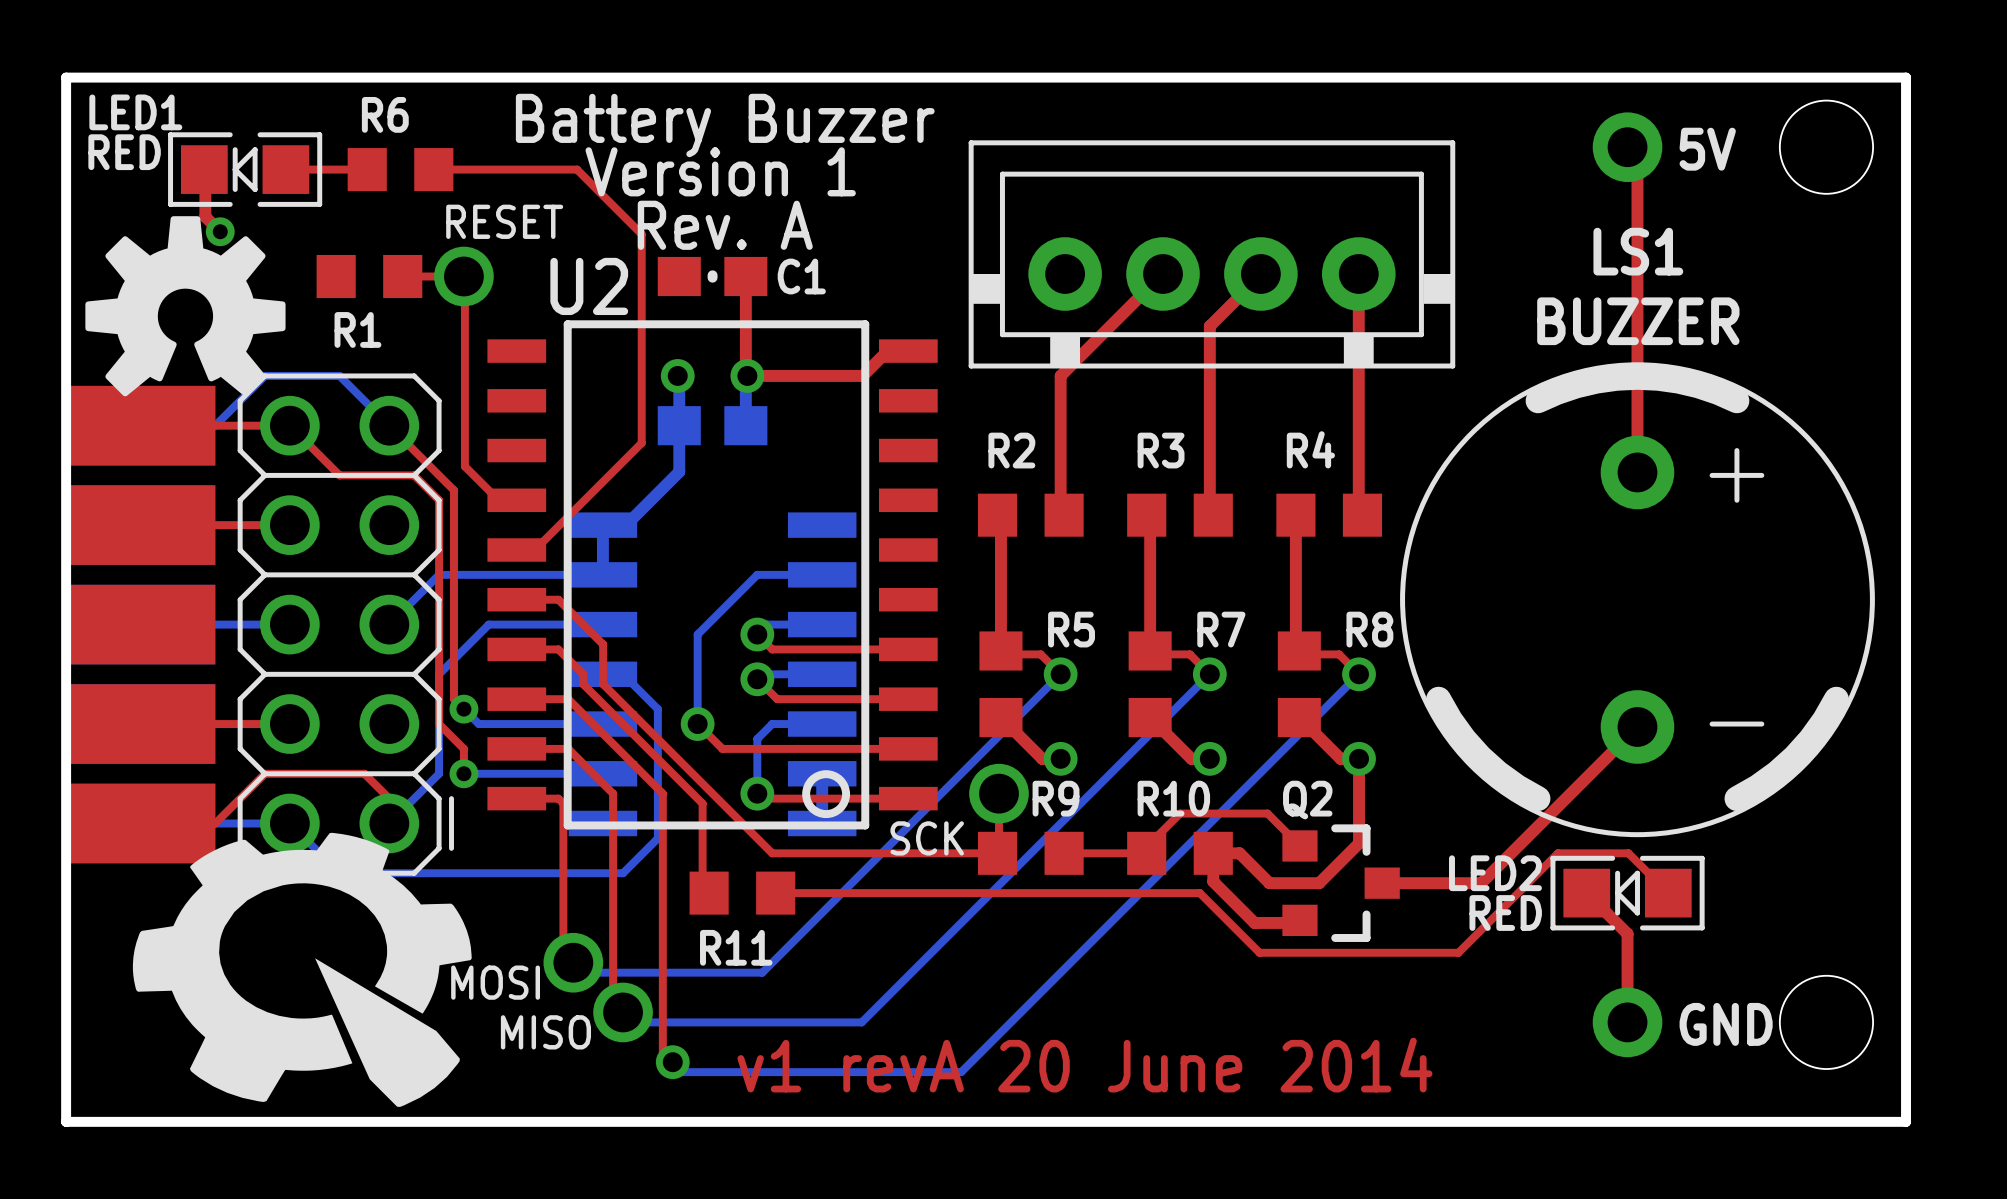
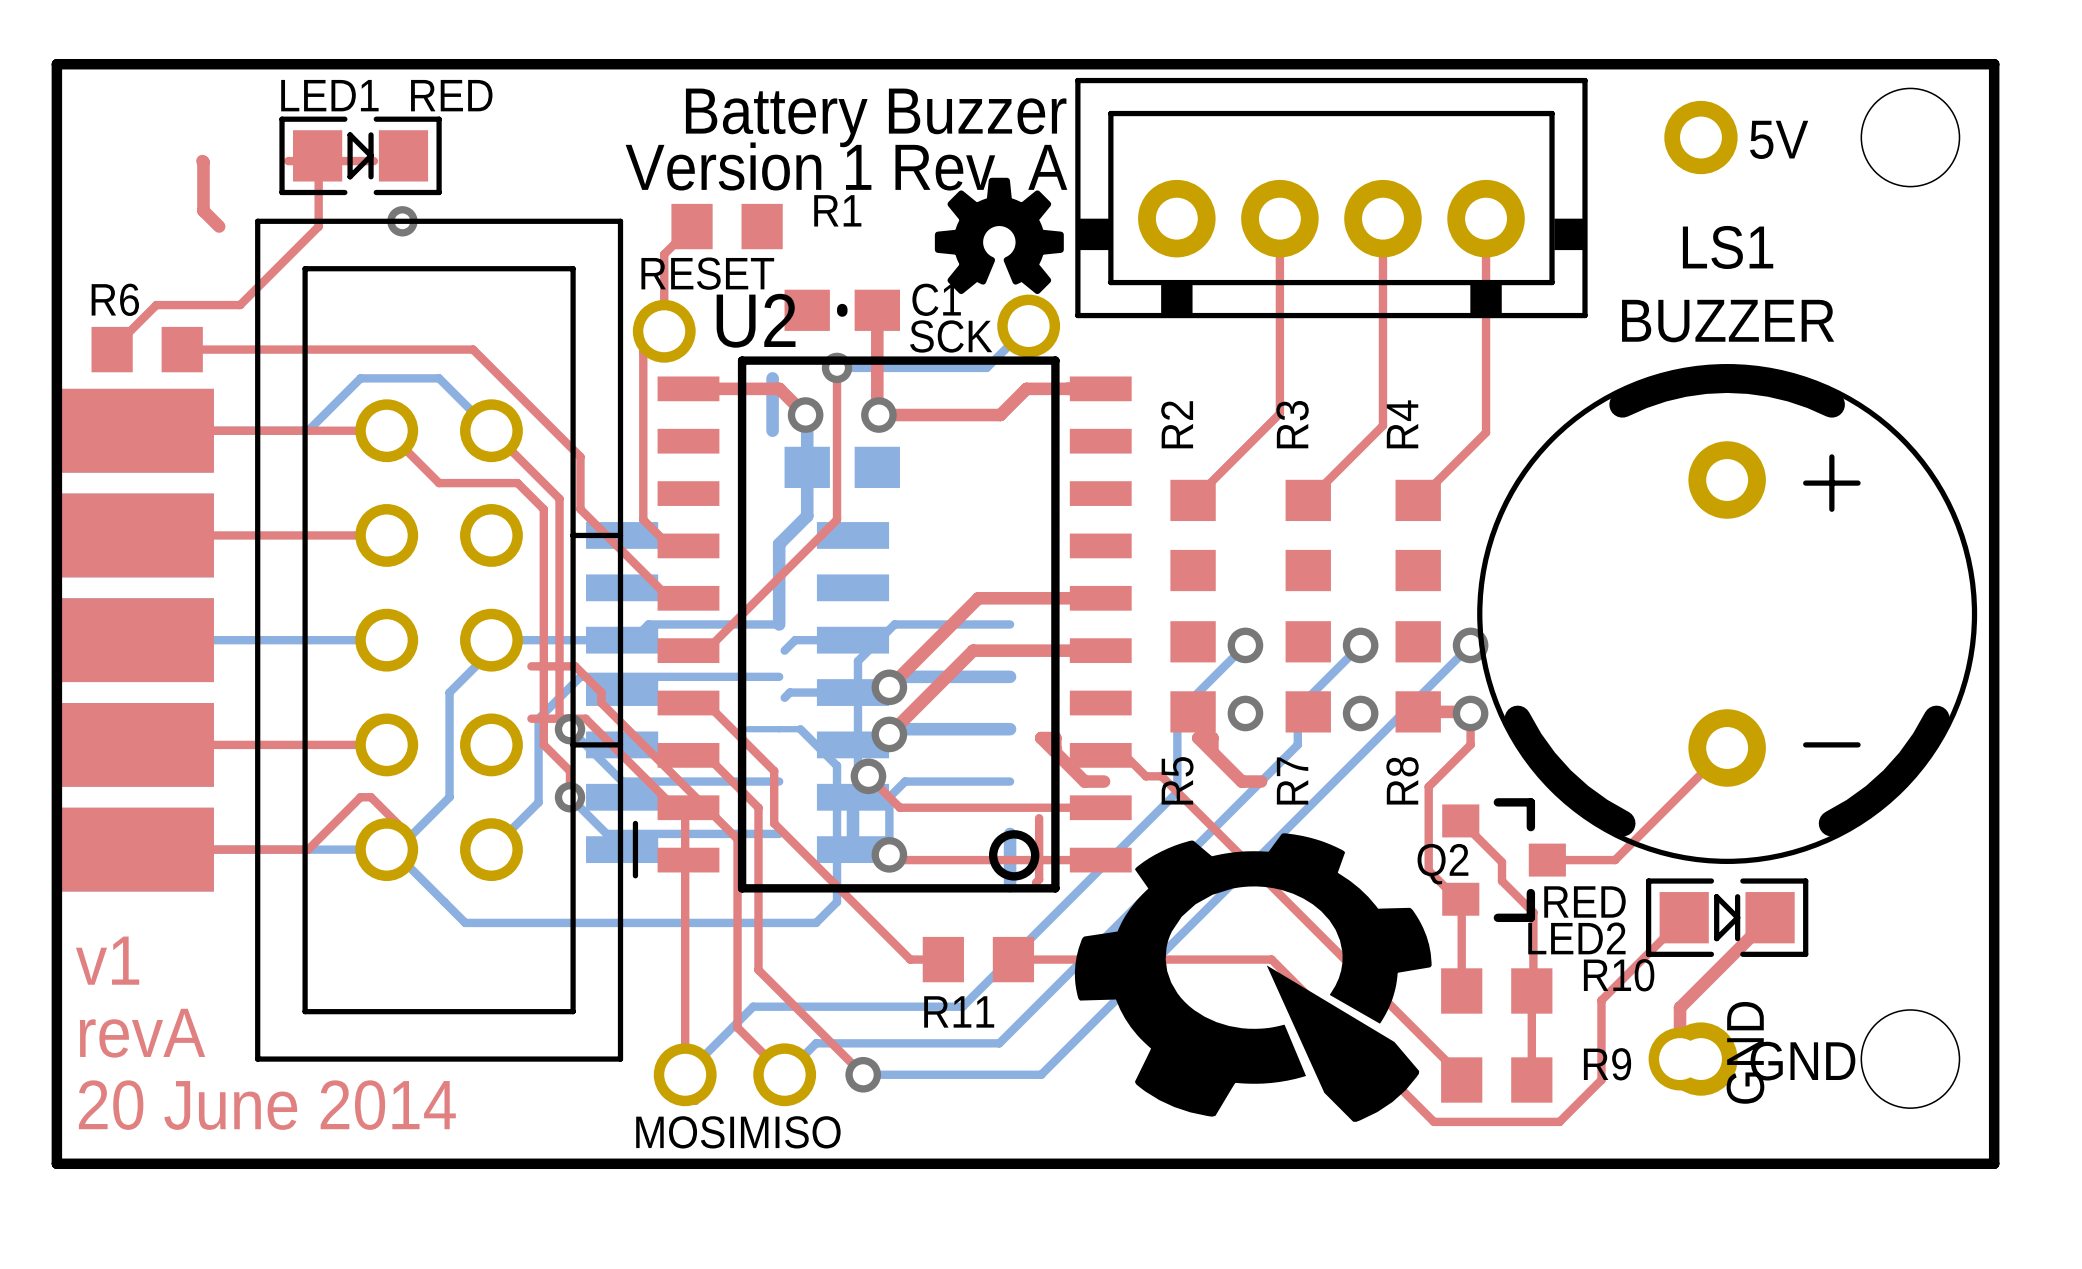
LED1 name position: LED1 (135, 112) -> LED1 (329, 95)
R6 name position: R6 (385, 114) -> R6 (115, 299)
text position: Battery Buzzer (725, 125) -> Battery Buzzer (876, 117)
top track: (1627, 147) (1637, 157) (1637, 472) -> none
top track: none -> (317, 155) (318, 226) (240, 305) (156, 305) (112, 349)
LED1 rotation: 0° (245, 169) -> 180° (360, 155)
LED1 position: (245, 169) -> (360, 155)
R6 position: (400, 169) -> (147, 349)
top track: (433, 169) (577, 169) (641, 234) (641, 443) (534, 549) (516, 549) -> none
text: Version 1 (720, 171) -> Version 1 Rev. A (846, 166)
drawing: none -> [934, 177, 1064, 295]
drawing: [85, 216, 286, 397] -> none
top track: none -> (1279, 218) (1279, 413) (1193, 500)
top track: none -> (1382, 218) (1382, 425) (1308, 500)
top track: none -> (1486, 218) (1486, 432) (1418, 500)
text: Rev. A (725, 225) -> none
via position: (220, 231) -> (402, 221)
top track: none -> (692, 226) (664, 254) (664, 331) (643, 352) (643, 519) (669, 545) (688, 545)
part position: (1211, 254) -> (1331, 198)
top track: (1162, 273) (1060, 375) (1060, 511) (1064, 515) -> none
top track: (1260, 273) (1209, 326) (1209, 511) (1213, 515) -> none
top track: (1358, 273) (1358, 511) (1362, 515) -> none
R1 position: (369, 276) -> (727, 226)
top track: (402, 276) (464, 277) (464, 466) (498, 500) (516, 500) -> none
RESET position: (463, 276) -> (664, 331)
C1 position: (712, 276) -> (842, 310)
top track: (745, 276) (745, 374) (747, 375) (862, 375) (887, 351) (926, 351) -> none
C1 name position: C1 (801, 276) -> C1 (936, 299)
top track: none -> (877, 310) (877, 413) (878, 415) (1000, 415) (1026, 388) (1100, 388)
bottom track: none -> (1028, 326) (986, 367) (837, 367)
R1 name position: R1 (357, 329) -> R1 (837, 210)
top track: none -> (182, 349) (473, 349) (580, 456) (580, 509) (669, 598) (688, 598)
top track: none -> (837, 367) (837, 519) (706, 650) (688, 650)
via: none -> (837, 367)
bottom track: (677, 375) (679, 375) (679, 471) (623, 528) (605, 528) (602, 525) (602, 574) -> none
via: (677, 375) -> none
via position: (747, 375) -> (805, 415)
top track: none -> (688, 388) (779, 388) (805, 415)
bottom track: none -> (805, 415) (807, 415) (807, 516) (779, 544) (779, 624) (648, 624) (632, 640) (622, 640)
via: none -> (878, 415)
bottom track: (215, 425) (265, 375) (339, 375) (389, 425) -> (213, 430) (308, 430) (360, 378) (439, 378) (491, 430)
top track: (289, 425) (339, 475) (414, 475) (439, 500) (439, 724) (463, 748) (463, 773) -> (292, 430) (386, 430) (439, 483) (517, 483) (543, 509) (543, 744) (569, 771) (569, 797)
top track: (389, 425) (453, 490) (453, 699) (463, 709) -> (491, 430) (559, 498) (559, 718) (569, 729)
part position: (712, 425) -> (842, 467)
top track: (997, 515) (1000, 518) (1000, 650) (1004, 654) (1040, 654) (1060, 674) -> none
R2 rotation: 0° (1030, 515) -> 90° clockwise (1193, 535)
R2 position: (1030, 515) -> (1193, 535)
top track: (1146, 515) (1150, 518) (1150, 650) (1153, 654) (1189, 654) (1209, 674) -> none
R3 rotation: 0° (1180, 515) -> 90° clockwise (1308, 535)
R3 position: (1180, 515) -> (1308, 535)
top track: (1295, 515) (1295, 647) (1302, 654) (1339, 654) (1359, 674) -> none
R4 rotation: 0° (1329, 515) -> 90° clockwise (1418, 535)
top track: none -> (292, 535) (386, 535)
bottom track: (602, 574) (439, 574) (389, 624) -> none
U2 position: (712, 574) -> (894, 624)
bottom track: (822, 574) (757, 574) (697, 634) (697, 724) -> none
top track: none -> (1100, 598) (978, 598) (889, 687)
top track: (516, 599) (558, 599) (603, 644) (603, 684) (772, 853) (997, 853) -> none
LS1 position: (1637, 599) -> (1727, 614)
bottom track: none -> (1010, 624) (894, 624) (857, 661) (857, 765) (868, 776)
bottom track: none -> (292, 640) (386, 640)
part: (345, 624) -> none
part: none -> (446, 640)
R5 name rotation: 0° (1071, 629) -> 90° counterclockwise (1177, 780)
R5 name position: R5 (1071, 629) -> R5 (1177, 780)
via: none -> (1245, 645)
R7 name rotation: 0° (1221, 629) -> 90° counterclockwise (1292, 780)
R7 name position: R7 (1221, 629) -> R7 (1292, 780)
bottom track: none -> (1360, 645) (1297, 708) (1297, 744) (999, 1043) (816, 1043) (784, 1074)
via: none -> (1360, 645)
R8 name rotation: 0° (1369, 629) -> 90° counterclockwise (1402, 780)
R8 name position: R8 (1369, 629) -> R8 (1402, 780)
bottom track: none -> (1470, 645) (1041, 1074) (863, 1074)
via: none -> (1470, 645)
top track: (757, 634) (772, 649) (908, 649) -> none
via: (757, 634) -> none
top track: none -> (1100, 650) (973, 650) (889, 734)
bottom track: none -> (779, 676) (580, 676) (538, 718) (538, 802) (491, 849)
bottom track: none -> (1010, 676) (899, 676) (889, 687)
via: none -> (889, 687)
bottom track: (623, 674) (657, 709) (657, 838) (623, 873) (339, 873) (289, 823) -> (748, 729) (800, 729) (837, 765) (837, 901) (816, 922) (465, 922) (391, 849) (292, 849)
bottom track: (1060, 674) (762, 972) -> (1245, 645) (1177, 713) (1177, 792) (962, 1006) (789, 1006)
via: (1060, 674) -> none
bottom track: (1209, 674) (861, 1022) (633, 1022) (623, 1012) -> none
via position: (1209, 674) -> (1245, 713)
bottom track: (1359, 674) (961, 1072) (682, 1072) (672, 1062) -> none
via: (1359, 674) -> none
top track: (757, 679) (777, 699) (908, 699) -> none
via: (757, 679) -> none
top track: none -> (679, 703) (706, 703) (774, 771) (774, 823) (910, 959) (943, 959)
R5 position: (1000, 684) -> (1193, 676)
R7 position: (1150, 684) -> (1308, 676)
R8 position: (1299, 684) -> (1418, 676)
top track: none -> (1418, 711) (1468, 711) (1470, 713) (1470, 744) (1428, 786) (1428, 870) (1457, 899) (1460, 899) (1466, 905)
via: none -> (1360, 713)
via: none -> (1470, 713)
bottom track: (463, 709) (478, 724) (602, 724) -> none
via: (463, 709) -> none
bottom track: none -> (569, 729) (622, 781) (779, 781)
via: none -> (569, 729)
bottom track: none -> (1010, 729) (894, 729) (889, 734)
via: none -> (889, 734)
top track: none -> (292, 744) (386, 744)
top track: (697, 724) (722, 748) (908, 748) -> none
via: (697, 724) -> none
bottom track: (822, 724) (772, 724) (757, 738) (757, 793) -> none
top track: (1637, 726) (1481, 883) (1382, 883) -> none
top track: none -> (1727, 747) (1615, 860) (1547, 860)
top track: (1312, 727) (1312, 717) (1299, 717) (1340, 758) (1359, 758) (1359, 843) (1319, 883) (1269, 883) (1239, 853) (1213, 853) (1213, 881) (1254, 922) (1297, 922) (1299, 920) (1302, 922) -> none
top track: none -> (688, 755) (706, 755) (758, 807) (758, 970) (863, 1074)
top track: none -> (1100, 755) (1125, 755) (1145, 776) (1161, 776) (1454, 1069) (1454, 1080) (1461, 1080)
top track: (498, 748) (568, 748) (613, 793) (613, 1002) (623, 1012) -> none
top track: none -> (868, 776) (899, 807) (1100, 807)
via: none -> (868, 776)
bottom track: none -> (1010, 781) (905, 781) (889, 797) (889, 854)
via: (1060, 758) -> none
via: (1209, 758) -> none
via: (1359, 758) -> none
top track: (354, 773) (265, 773) (215, 823) -> (360, 797) (308, 849) (213, 849)
bottom track: (463, 773) (602, 773) -> none
via: (463, 773) -> none
bottom track: none -> (569, 797) (606, 833) (779, 833)
via: none -> (569, 797)
top track: (757, 793) (762, 798) (908, 798) -> none
via: (757, 793) -> none
SCK position: (998, 793) -> (1028, 326)
top track: (509, 798) (558, 798) (563, 803) (563, 952) (573, 962) -> none
R9 name position: R9 (1056, 798) -> R9 (1607, 1064)
R10 name position: R10 (1173, 798) -> R10 (1619, 975)
top track: none -> (1460, 824) (1460, 820) (1502, 862) (1502, 881) (1533, 912) (1531, 1080) (1538, 1073)
Q2 name position: Q2 (1307, 800) -> Q2 (1442, 864)
top track: (702, 803) (702, 886) (709, 893) -> (727, 828) (737, 839) (737, 1027) (784, 1074)
bottom track: none -> (1010, 833) (1010, 886)
top track: none -> (889, 854) (894, 860) (1100, 860)
via: none -> (889, 854)
SCK name position: SCK (927, 838) -> SCK (951, 336)
top track: (1299, 845) (1267, 813) (1180, 813) (1146, 846) (1146, 853) (1064, 853) -> none
R9 position: (1030, 853) -> (1496, 1080)
R10 position: (1180, 853) -> (1496, 990)
top track: none -> (1461, 900) (1461, 990)
Q2 position: (1341, 883) -> (1504, 860)
top track: none -> (1684, 917) (1601, 1000) (1601, 1080) (1559, 1121) (1433, 1121) (1271, 959) (1013, 959)
top track: none -> (1770, 917) (1680, 1007) (1680, 1059)
R11 position: (742, 893) -> (978, 959)
top track: (775, 893) (1199, 893) (1259, 952) (1458, 952) (1557, 853) (1628, 853) (1668, 893) -> none
top track: (1586, 893) (1627, 933) (1627, 1022) -> none
LED2 rotation: 0° (1627, 893) -> 180° (1727, 917)
text: none -> v1 (107, 960)
R11 name position: R11 (736, 947) -> R11 (959, 1011)
bottom track: (573, 962) (583, 972) (727, 972) -> (685, 1074) (753, 1006)
MOSI position: (573, 962) -> (685, 1074)
drawing position: (302, 969) -> (1253, 977)
MOSI name position: MOSI (495, 982) -> MOSI (685, 1132)
text: none -> revA (142, 1033)
MISO position: (623, 1012) -> (784, 1074)
GND: none -> (1680, 1059)
MISO name position: MISO (545, 1032) -> MISO (790, 1132)
via: none -> (863, 1074)
via: (672, 1062) -> none
text: none -> 20 June 2014 (267, 1105)
text: v1 revA 20 June 2014 (1084, 1065) -> none

